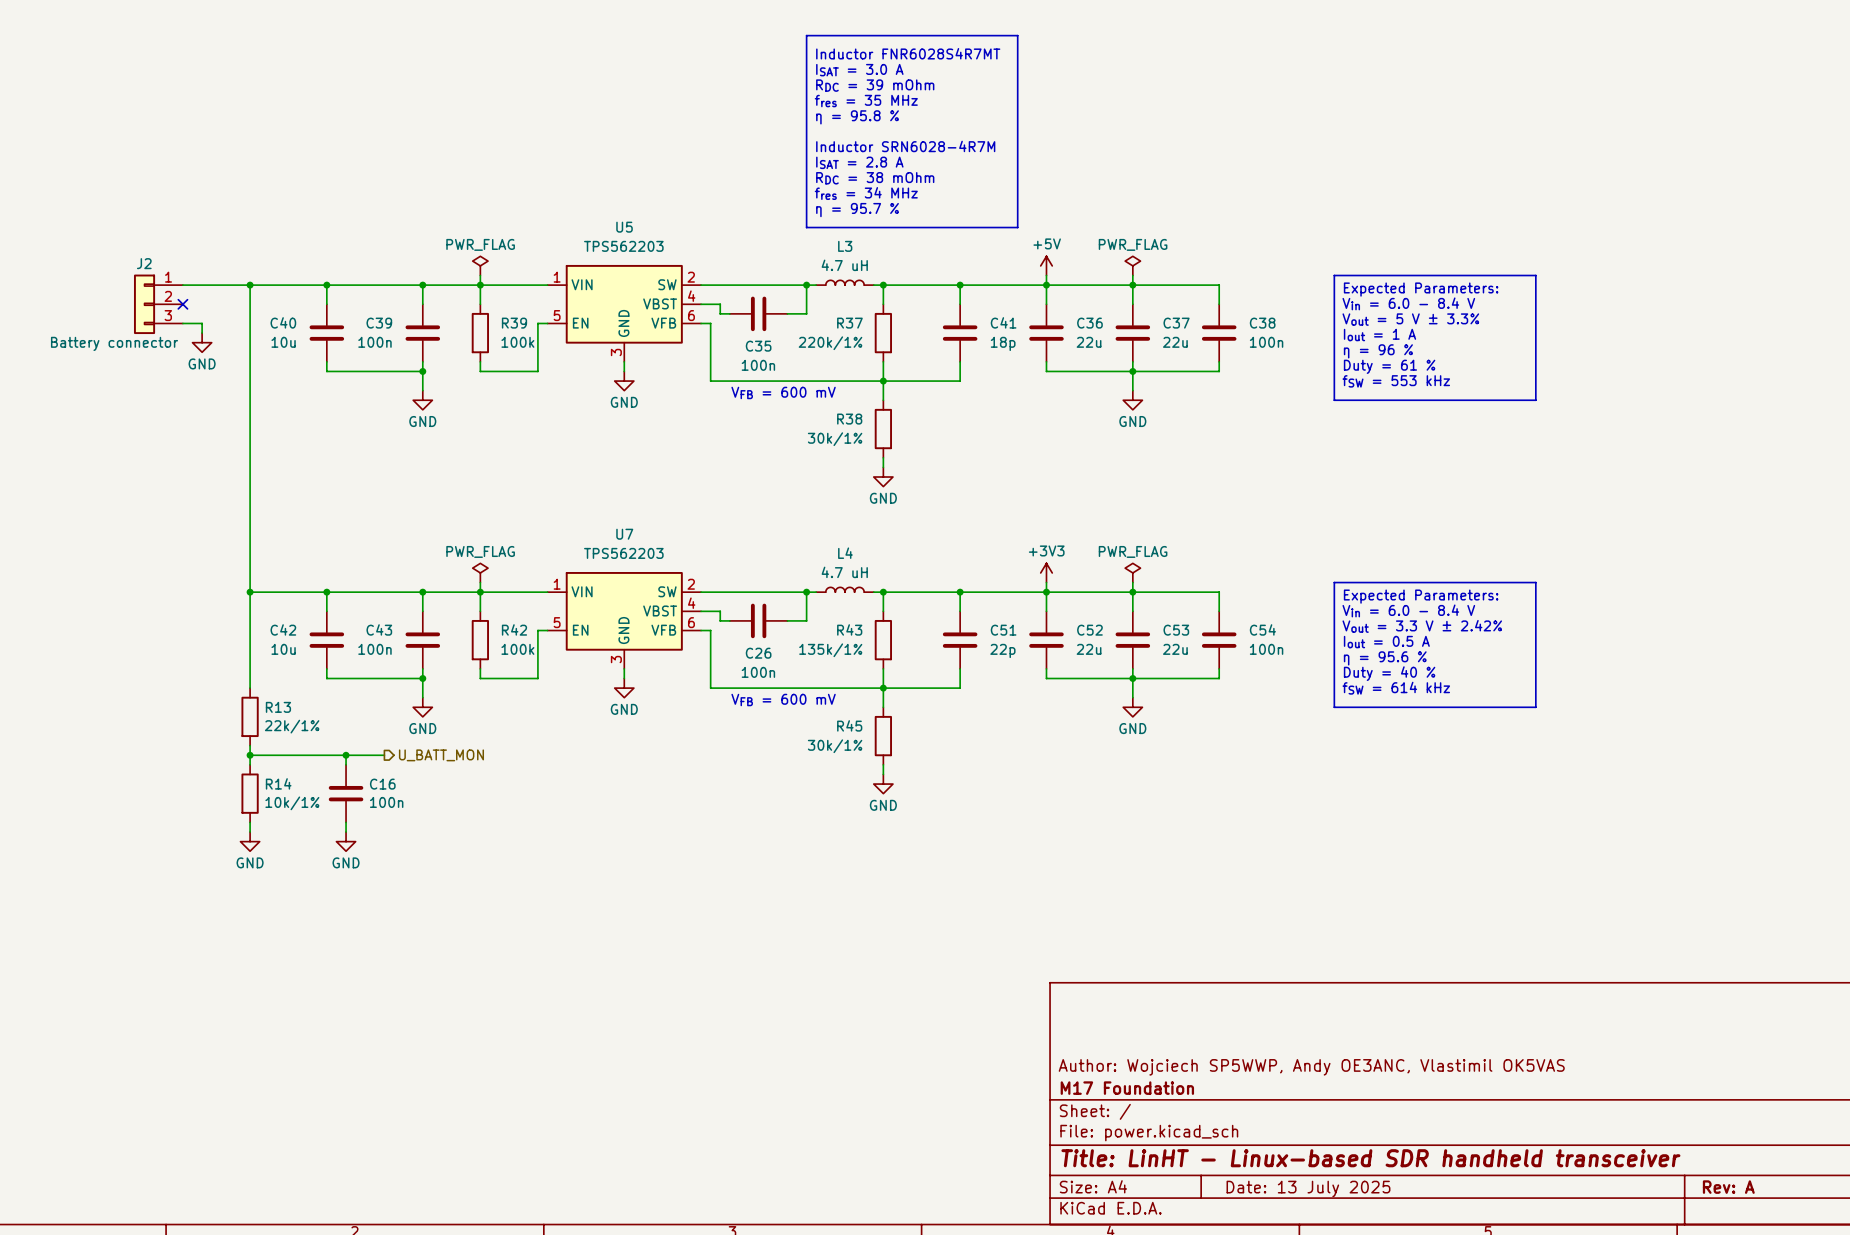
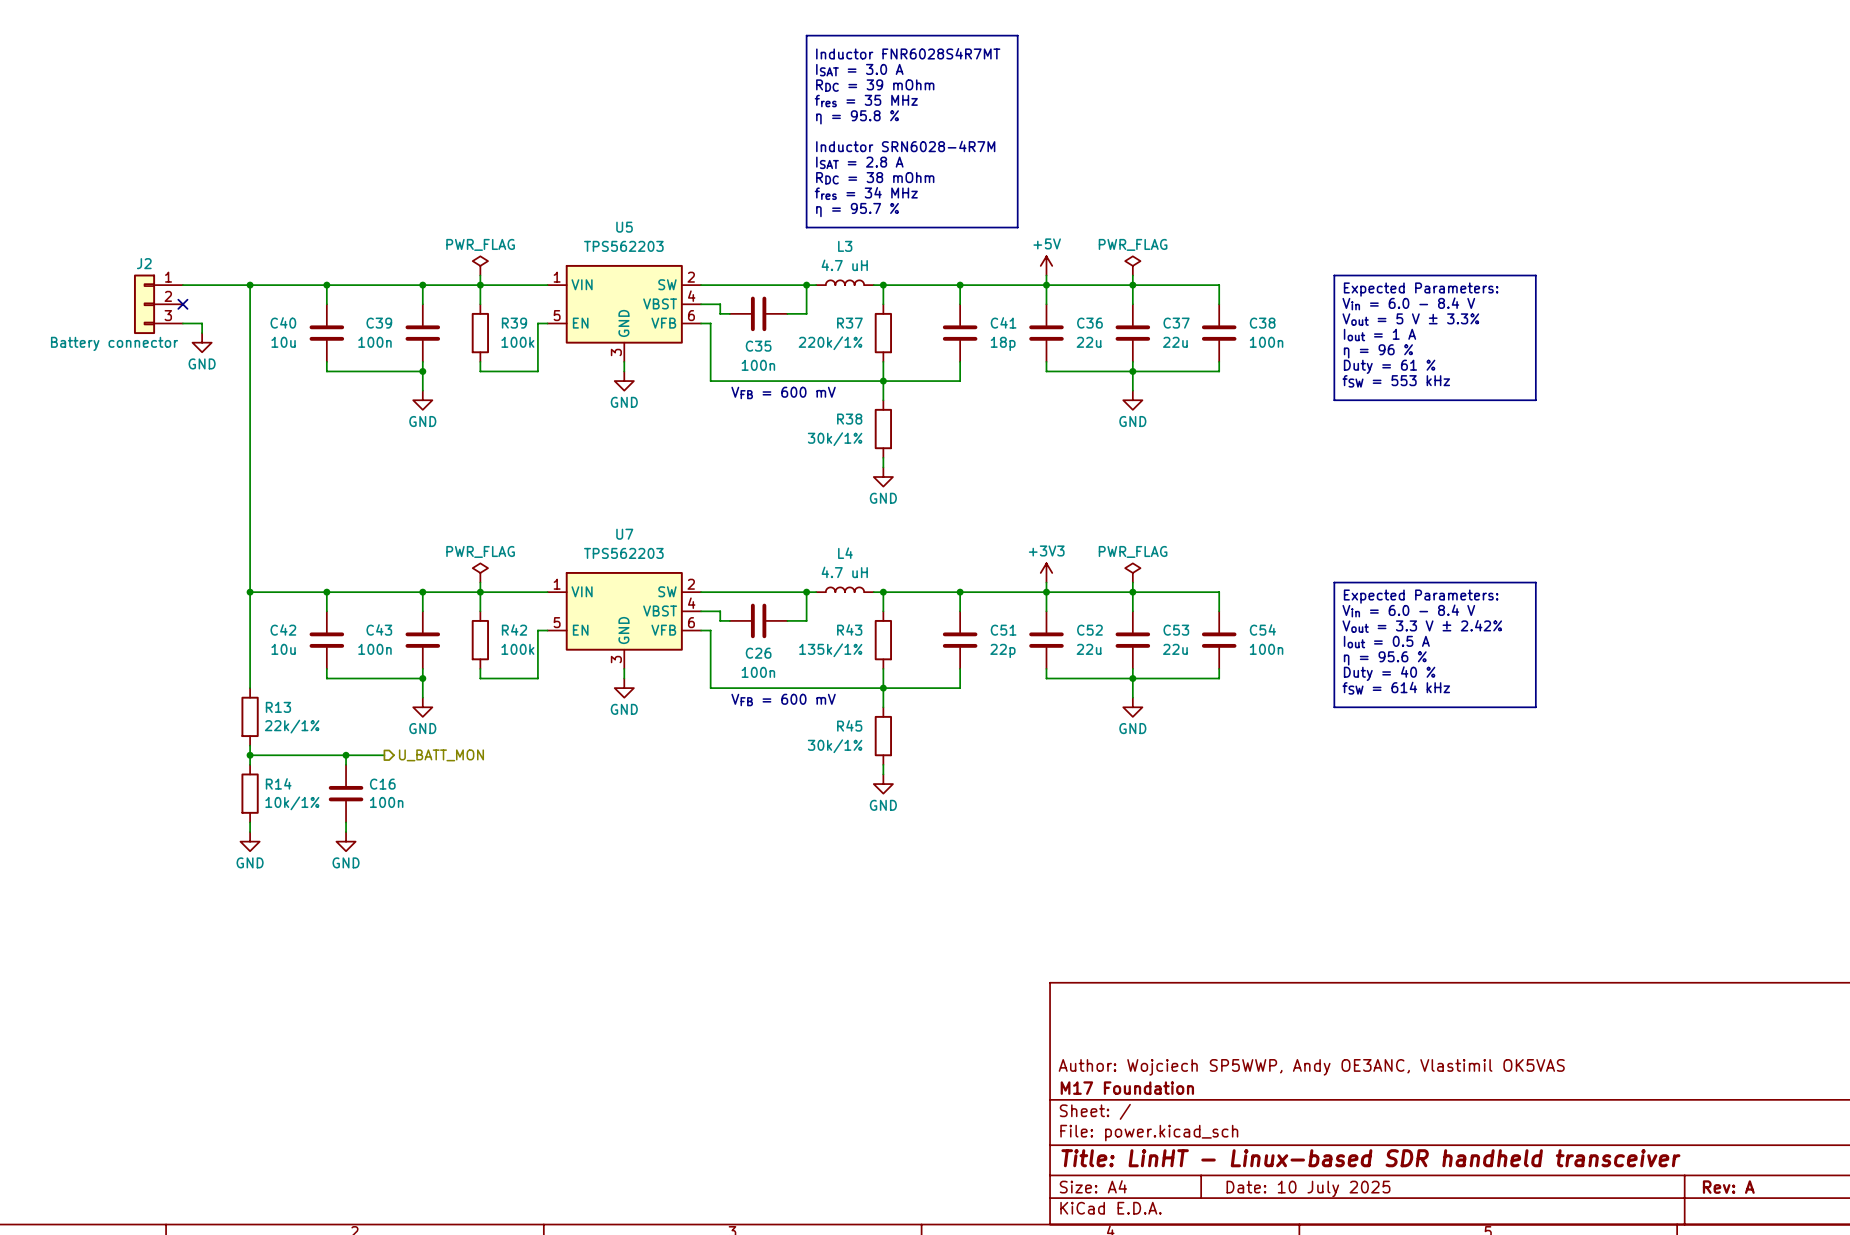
title block: Date: 13 July 2025 (1308, 1188) -> Date: 10 July 2025 (1308, 1188)

